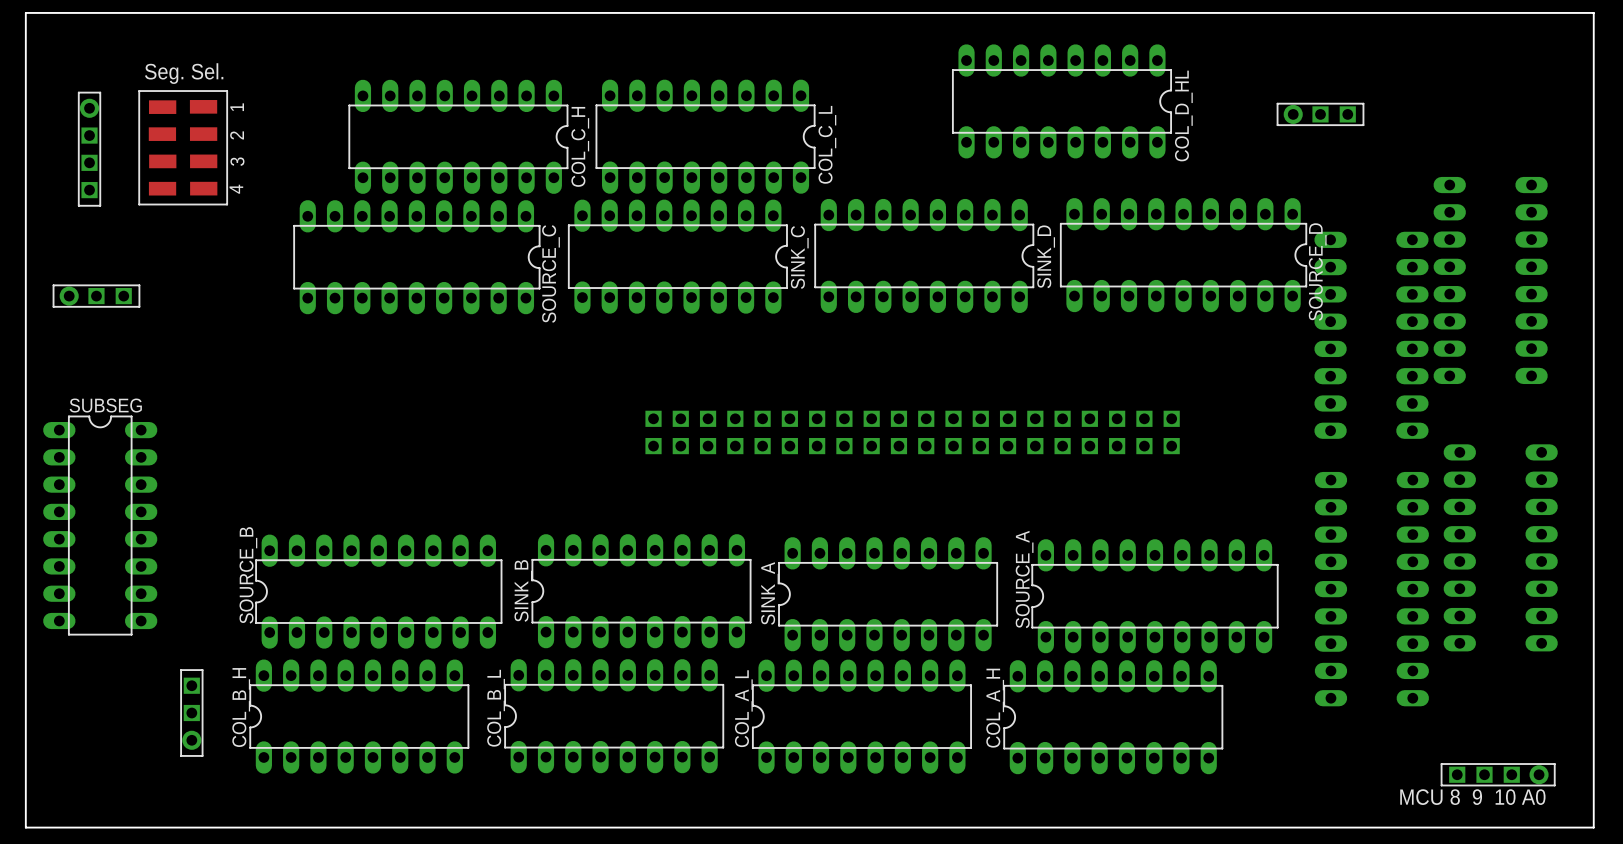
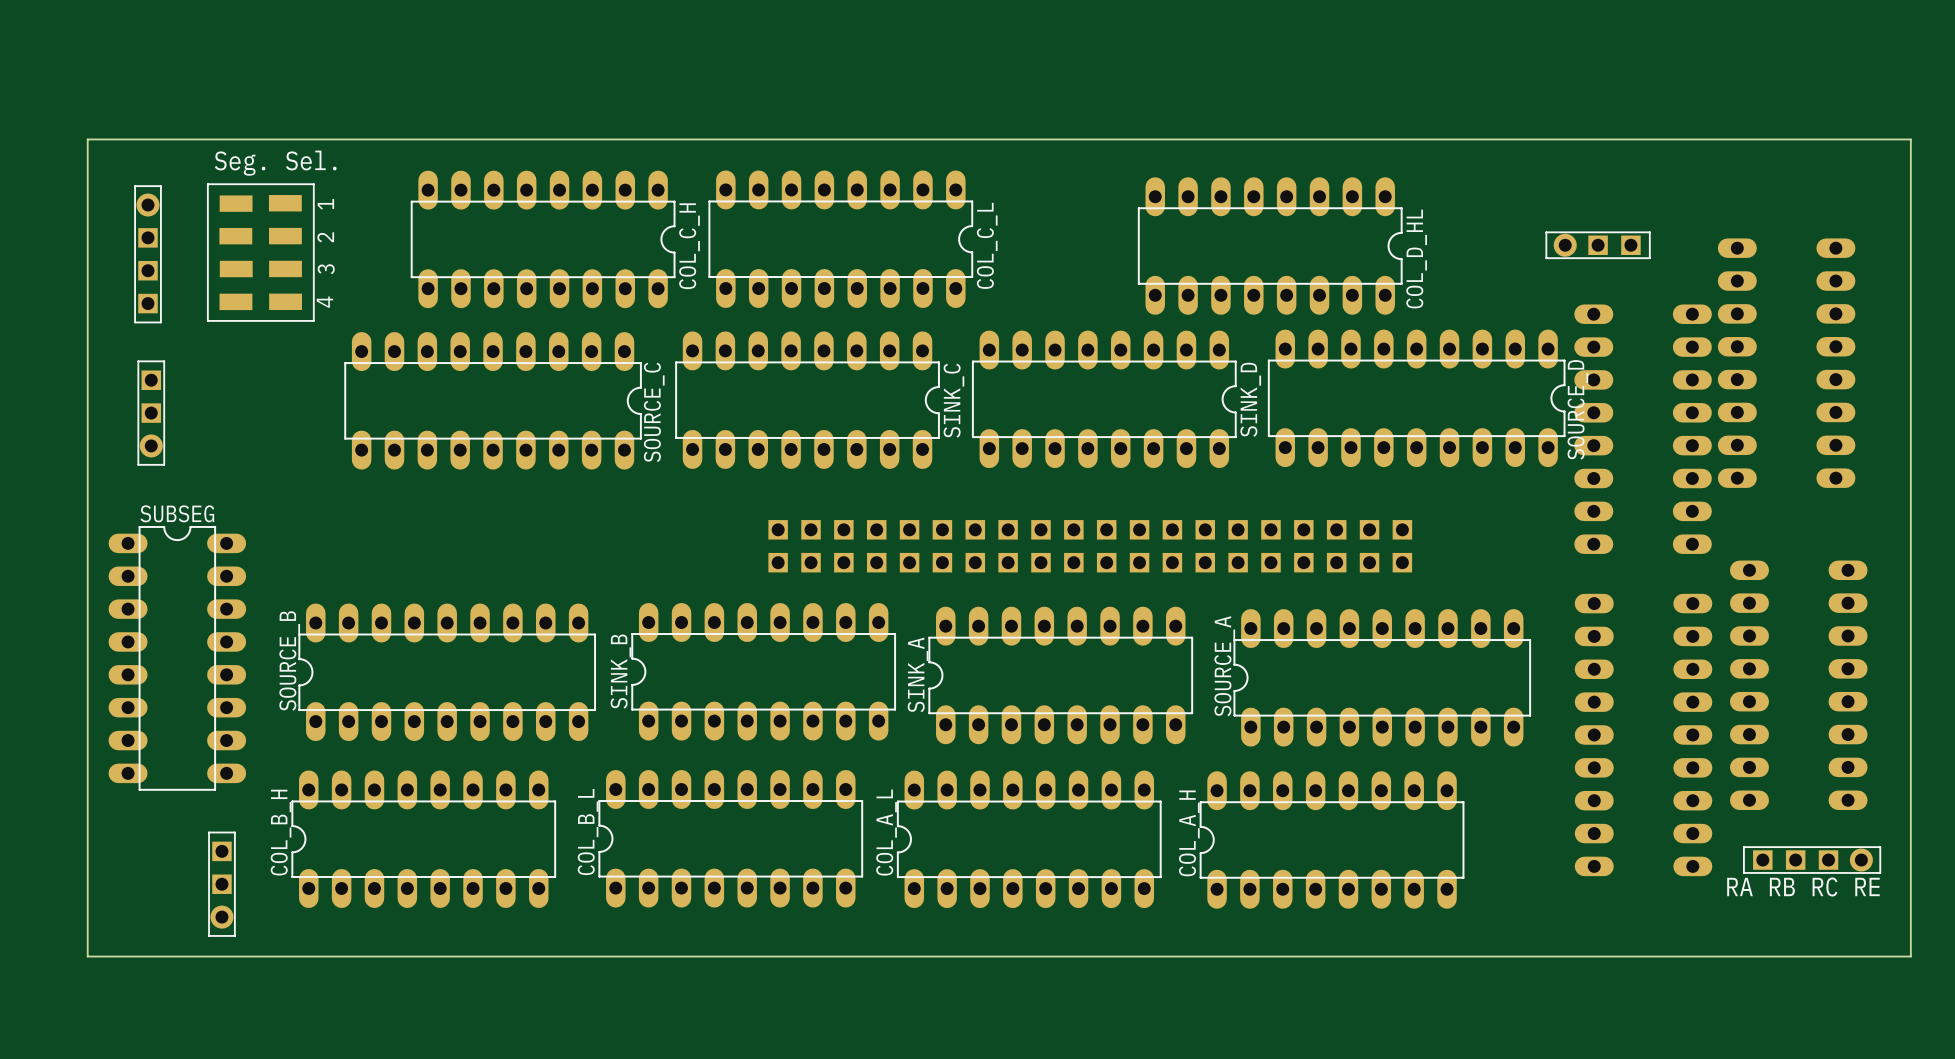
text position: Seg. Sel. (184, 73) -> Seg. Sel. (275, 163)
board edge: (1593, 94) (1593, 12) (25, 12) (25, 827) (1593, 827) (1593, 773) -> (1910, 139) (87, 139) (87, 956) (1910, 956)
COL_D_HL position: (1061, 101) -> (1270, 246)
part position: (1320, 114) -> (1598, 245)
COL_C_H position: (458, 136) -> (543, 239)
COL_C_L position: (705, 136) -> (840, 239)
part position: (183, 147) -> (260, 252)
part position: (89, 149) -> (148, 254)
SINK_D position: (924, 255) -> (1104, 399)
SOURCE_D position: (1183, 255) -> (1416, 398)
SINK_C position: (677, 256) -> (807, 400)
SOURCE_C position: (416, 257) -> (493, 400)
part rotation: 0° (96, 296) -> 90° counterclockwise (151, 413)
SUBSEG position: (100, 525) -> (177, 658)
SOURCE_B position: (378, 591) -> (447, 672)
SINK_B position: (641, 591) -> (763, 671)
SINK_A position: (888, 594) -> (1060, 675)
SOURCE_A position: (1154, 596) -> (1382, 677)
text: none -> RA RB RC RE (1803, 886)
COL_B_H position: (359, 716) -> (423, 839)
COL_B_L position: (614, 716) -> (730, 838)
COL_A_L position: (861, 716) -> (1029, 839)
COL_A_H position: (1113, 717) -> (1332, 839)
part position: (1498, 774) -> (1812, 860)
text: MCU 8 9 10 A0 (1472, 797) -> none

